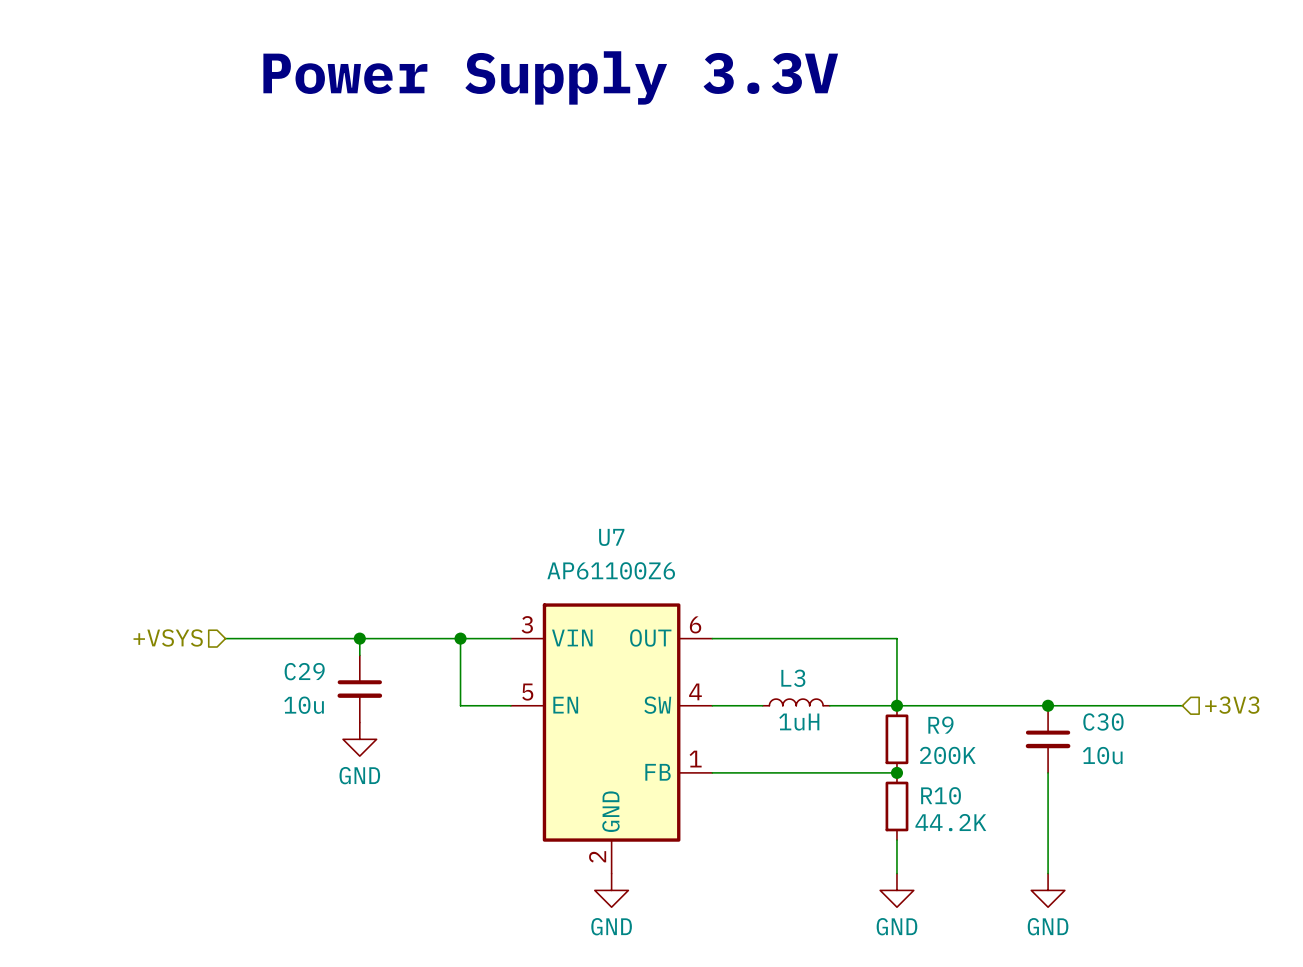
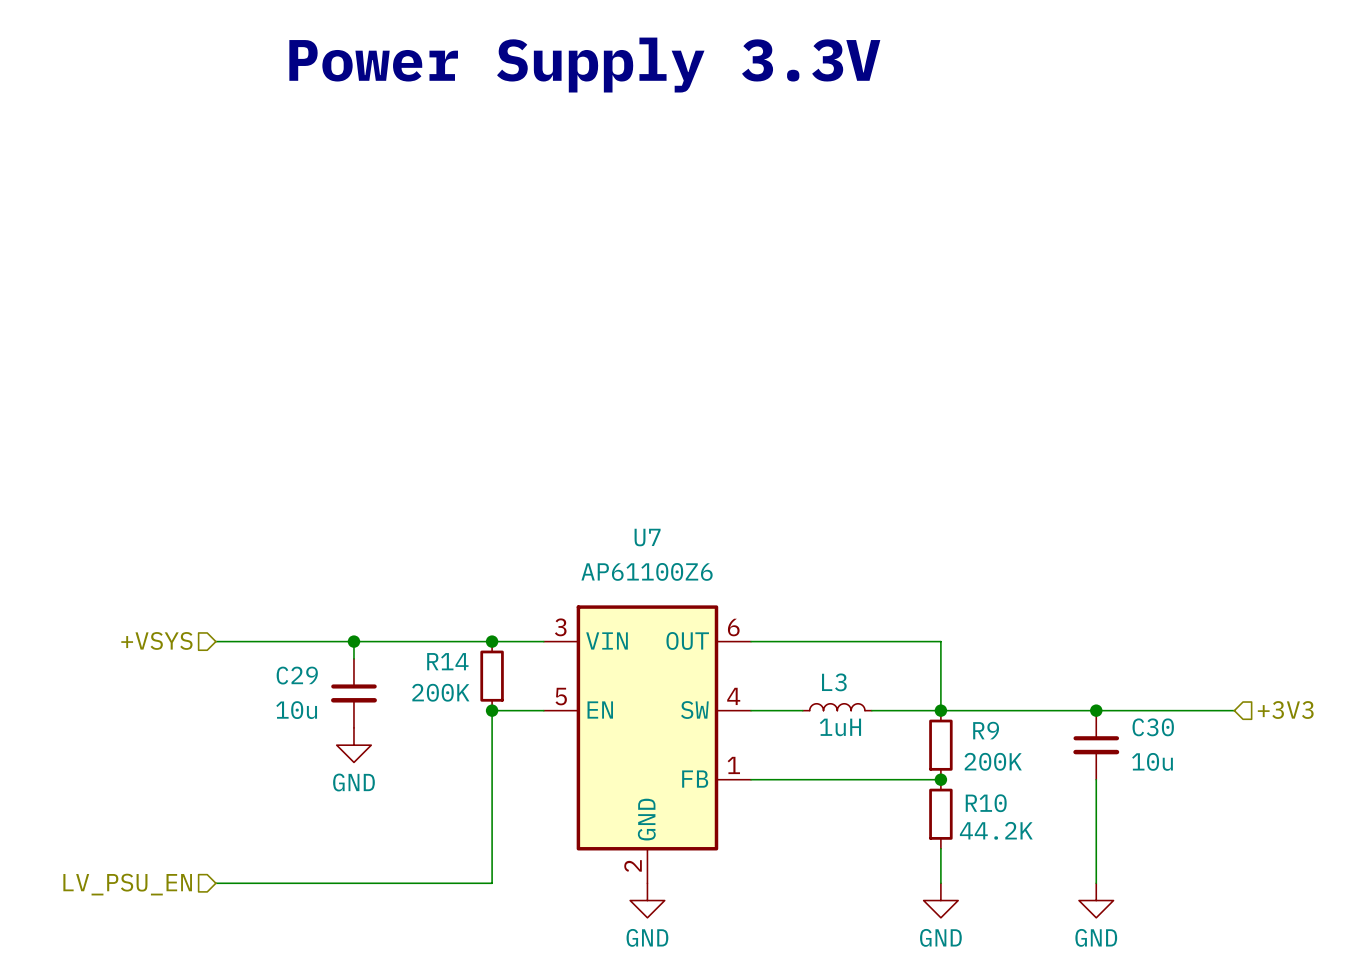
hierarchical label position: +VSYS (168, 637) -> +VSYS (156, 640)
wire: none -> (215, 641) (250, 641)
wire: (359, 638) (359, 655) -> (353, 641) (353, 658)
junction position: (359, 638) -> (353, 641)
wire: (460, 638) (460, 705) -> (215, 883) (492, 883) (492, 710)
R14: none -> 200K (492, 676)
C29 position: (359, 688) -> (353, 693)
junction: none -> (492, 710)
power symbol position: GND (359, 739) -> GND (353, 745)
hierarchical label: none -> LV_PSU_EN (127, 884)

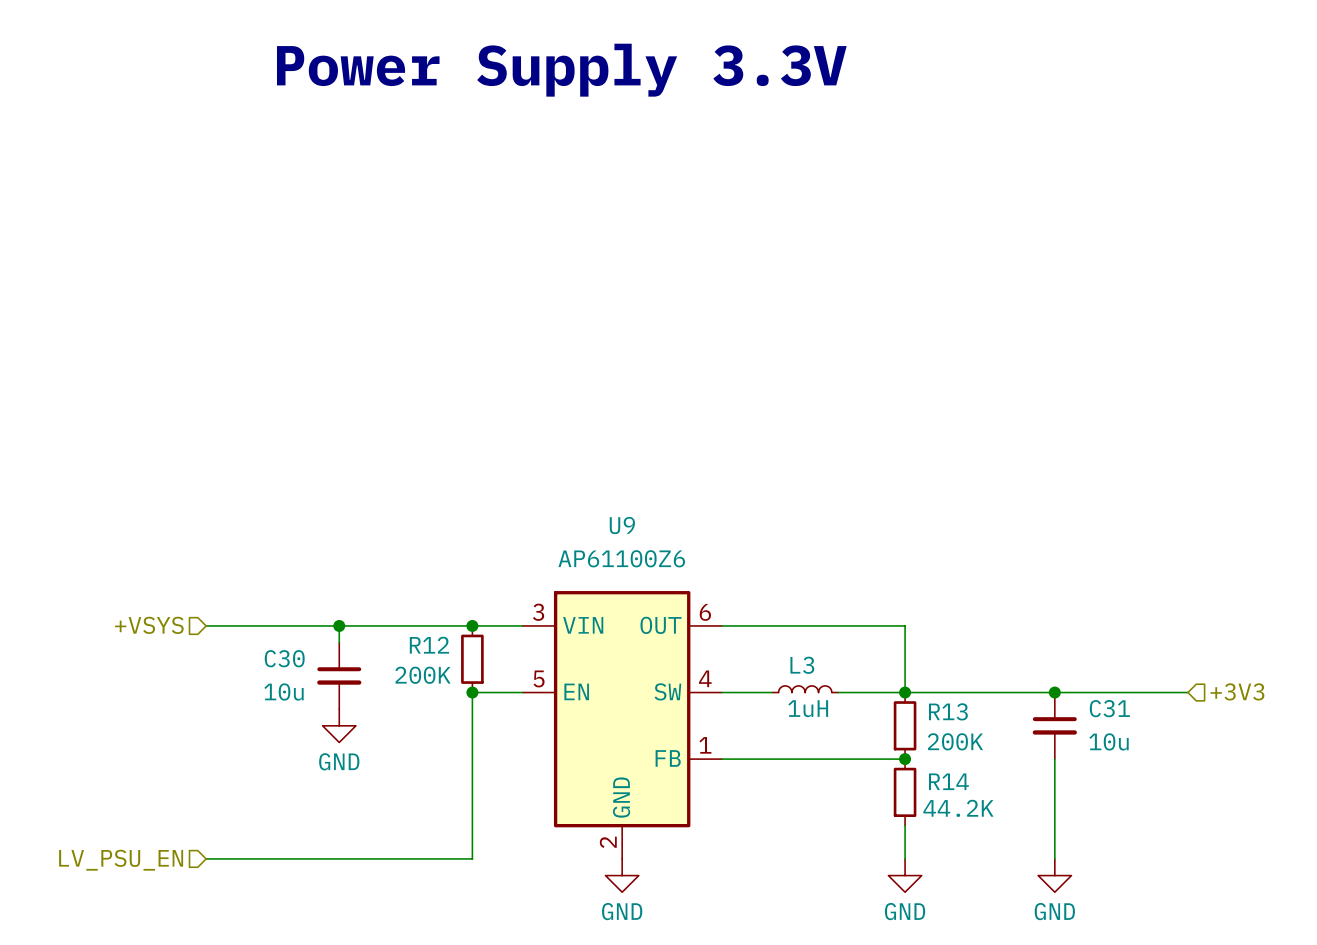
U7 name: U7 (647, 537) -> U9 (622, 525)
R14 name: R14 (447, 661) -> R12 (429, 645)
C29 name: C29 (297, 675) -> C30 (284, 658)
C30 name: C30 (1153, 727) -> C31 (1109, 708)
R9 name: R9 (986, 730) -> R13 (948, 711)
R10 name: R10 (986, 803) -> R14 (948, 781)

